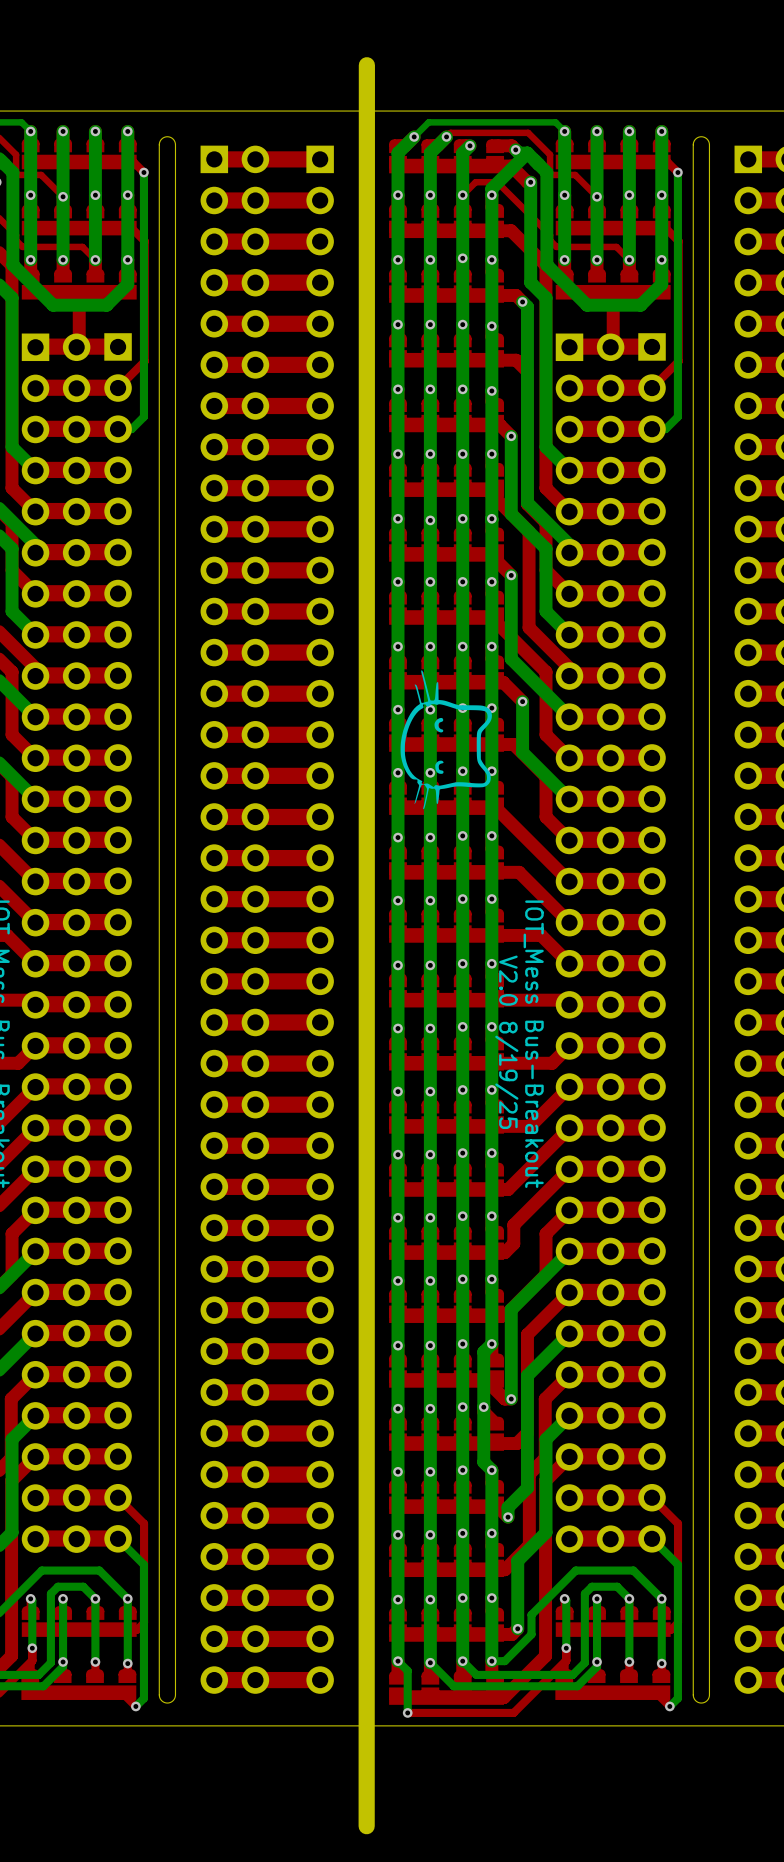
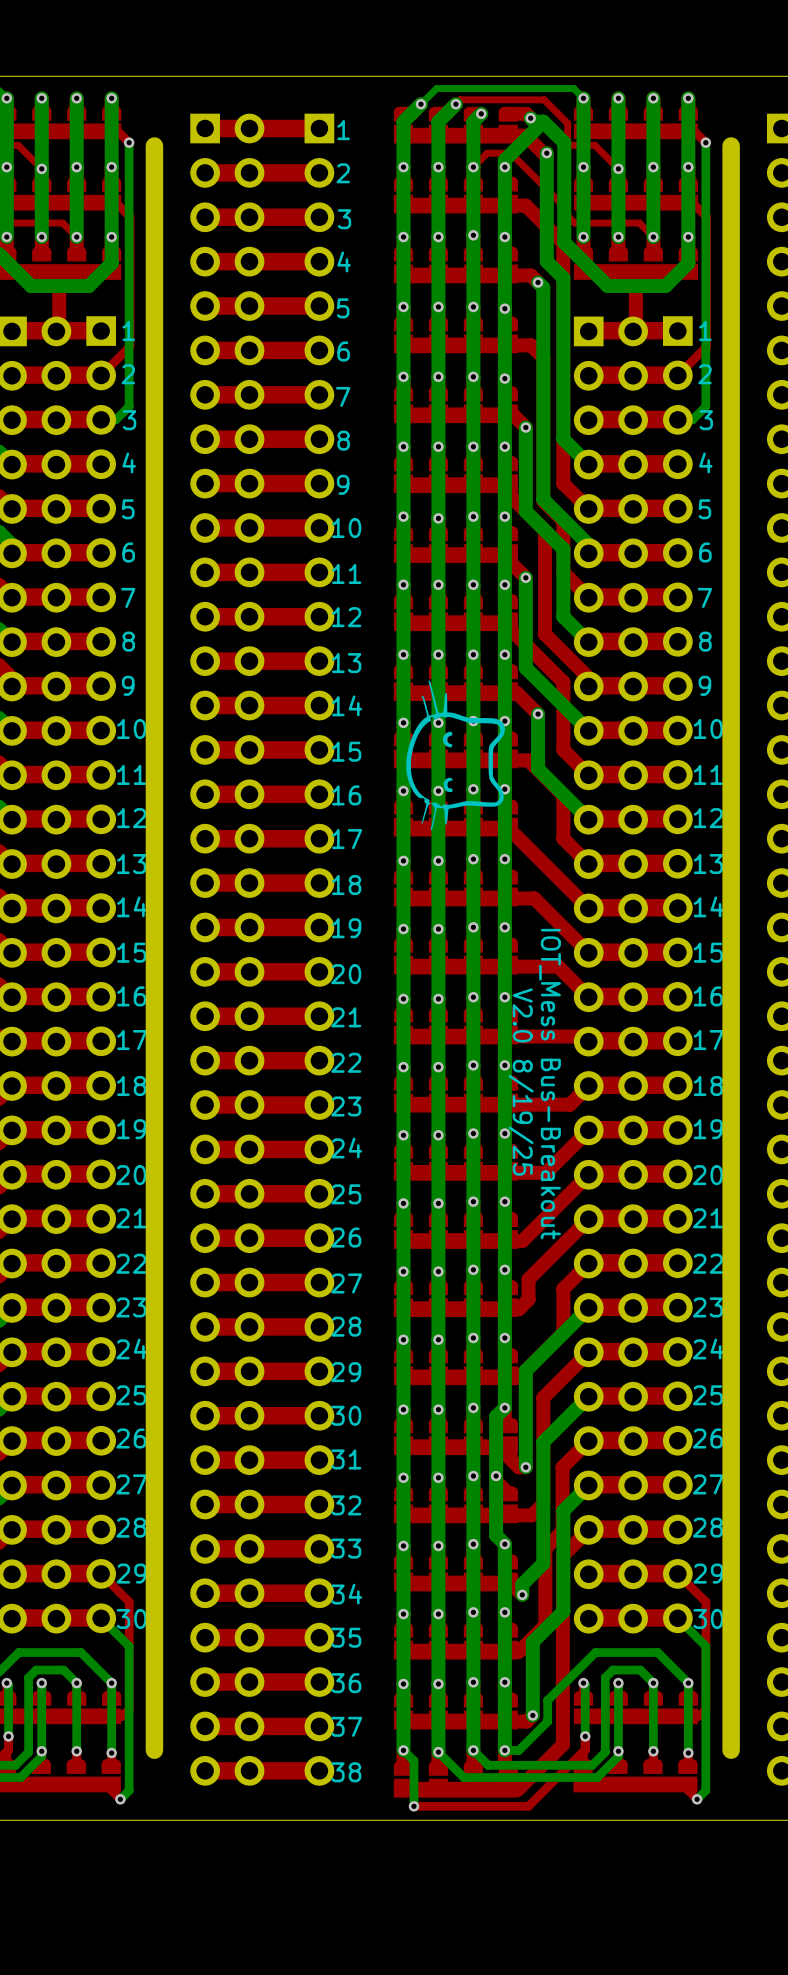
board edge: (366, 65) (366, 1826) -> none
board edge: (175, 144) (175, 1694) (173, 1700) (167, 1703) (161, 1700) (159, 1694) (159, 144) (161, 139) (167, 136) (173, 139) (175, 144) -> none
board edge: (709, 144) (709, 1694) (707, 1700) (701, 1703) (695, 1700) (693, 1694) (693, 144) (696, 138) (701, 136) (707, 139) (709, 144) -> none
text: none -> 1 (343, 130)
board edge: none -> (154, 145) (154, 1750)
board edge: none -> (731, 145) (731, 1750)
text: none -> 2 (343, 173)
text: none -> 3 (344, 219)
text: none -> 4 (344, 261)
text: none -> 5 (343, 308)
text: none -> 1 (128, 331)
text: none -> 1 (705, 331)
text: none -> 6 (343, 351)
text: none -> 2 (128, 374)
text: none -> 2 (704, 374)
text: none -> 7 (343, 396)
text: none -> 3 (129, 420)
text: none -> 3 (706, 420)
text: none -> 8 (343, 440)
text: none -> 4 (129, 462)
text: none -> 4 (705, 462)
text: none -> 9 (343, 484)
text: none -> 5 (128, 509)
text: none -> 5 (704, 509)
text: none -> 10 (346, 528)
text: none -> 6 (128, 552)
text: none -> 6 (705, 552)
text: none -> 11 (346, 573)
text: none -> 7 (128, 597)
text: none -> 7 (704, 597)
text: none -> 12 (346, 617)
text: none -> 8 (128, 641)
text: none -> 8 (705, 641)
text: none -> 13 (346, 663)
text: none -> 9 (128, 685)
text: none -> 9 (704, 685)
text: none -> 14 (347, 705)
text: none -> 10 (131, 728)
text: none -> 10 (708, 728)
text: none -> 15 (346, 751)
text: none -> 11 (131, 774)
text: none -> 11 (708, 774)
text: none -> 16 (346, 795)
text: none -> 12 (131, 818)
text: none -> 12 (708, 818)
text: none -> 17 (347, 839)
text: none -> 13 (131, 864)
text: none -> 13 (708, 864)
text: none -> 18 (346, 885)
text: none -> 14 (132, 906)
text: none -> 14 (708, 906)
text: none -> 19 (346, 928)
text: none -> 15 (131, 952)
text: none -> 15 (708, 952)
text: none -> 20 (346, 974)
text: none -> 16 (131, 996)
text: none -> 16 (708, 996)
text: none -> 21 (346, 1017)
text: none -> 17 (132, 1040)
text: none -> 17 (708, 1040)
text: none -> 22 (346, 1062)
text: none -> 18 (131, 1085)
text: none -> 18 (708, 1085)
text: none -> 23 (346, 1106)
text: none -> 19 (131, 1129)
text: none -> 19 (708, 1129)
text: none -> 24 (346, 1147)
text: none -> 20 (131, 1175)
text: none -> 20 (708, 1175)
text: none -> 25 (346, 1194)
text: none -> 21 (131, 1218)
text: none -> 21 (708, 1218)
text: none -> 26 (346, 1237)
text: none -> 22 (131, 1263)
text: none -> 22 (708, 1263)
text: none -> 27 (346, 1283)
text: none -> 23 (131, 1307)
text: none -> 23 (708, 1307)
text: none -> 28 (346, 1326)
text: none -> 24 (131, 1348)
text: none -> 24 (708, 1348)
text: none -> 29 (346, 1372)
text: none -> 25 (131, 1395)
text: none -> 25 (708, 1395)
text: none -> 30 (346, 1415)
text: none -> 26 (131, 1438)
text: none -> 26 (708, 1438)
text: none -> 31 (346, 1459)
text: none -> 27 (131, 1484)
text: none -> 27 (708, 1484)
text: none -> 32 (346, 1505)
text: none -> 28 (131, 1527)
text: none -> 28 (708, 1527)
text: none -> 33 (346, 1548)
text: none -> 29 (131, 1573)
text: none -> 29 (708, 1573)
text: none -> 34 (346, 1594)
text: none -> 30 (131, 1618)
text: none -> 30 (708, 1618)
text: none -> 35 (346, 1637)
text: none -> 36 (346, 1683)
text: none -> 37 (346, 1726)
text: none -> 38 (346, 1772)

